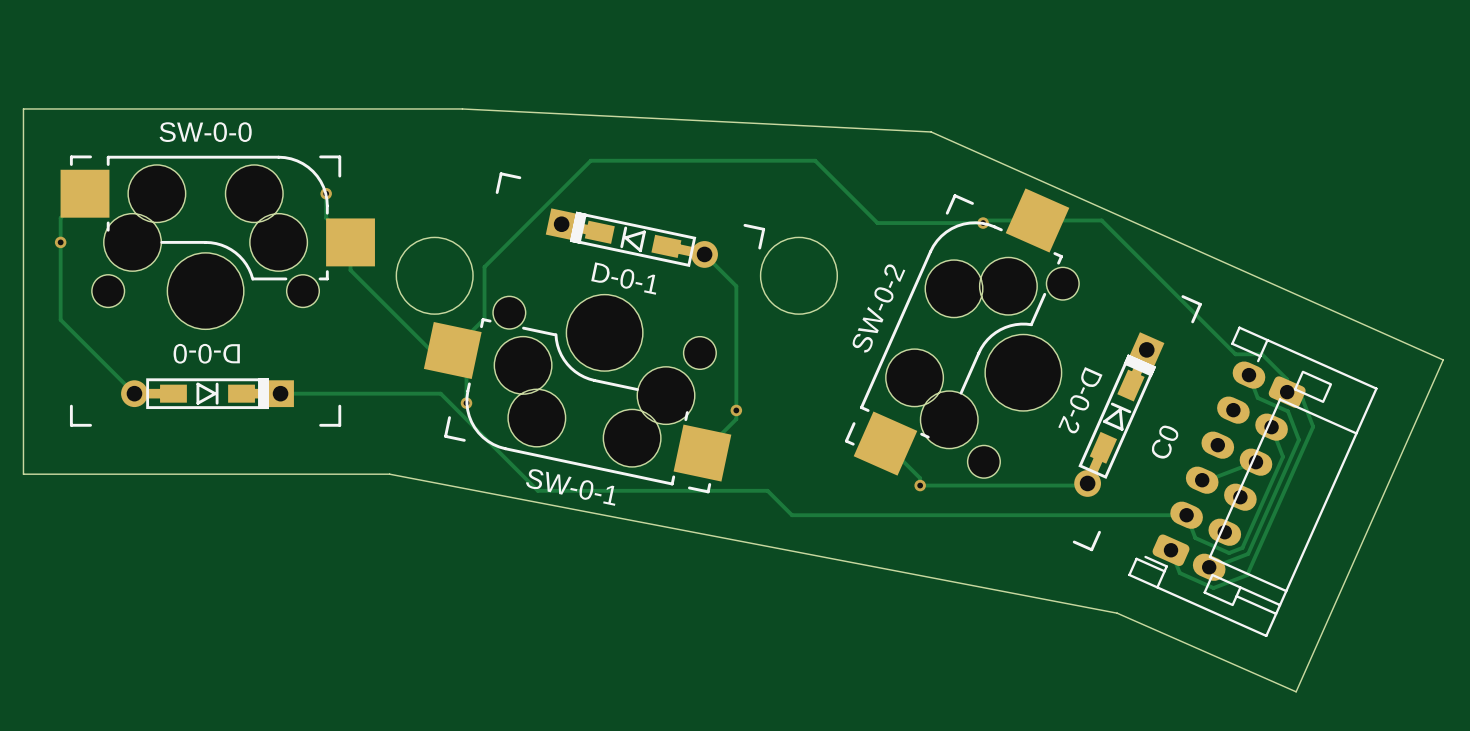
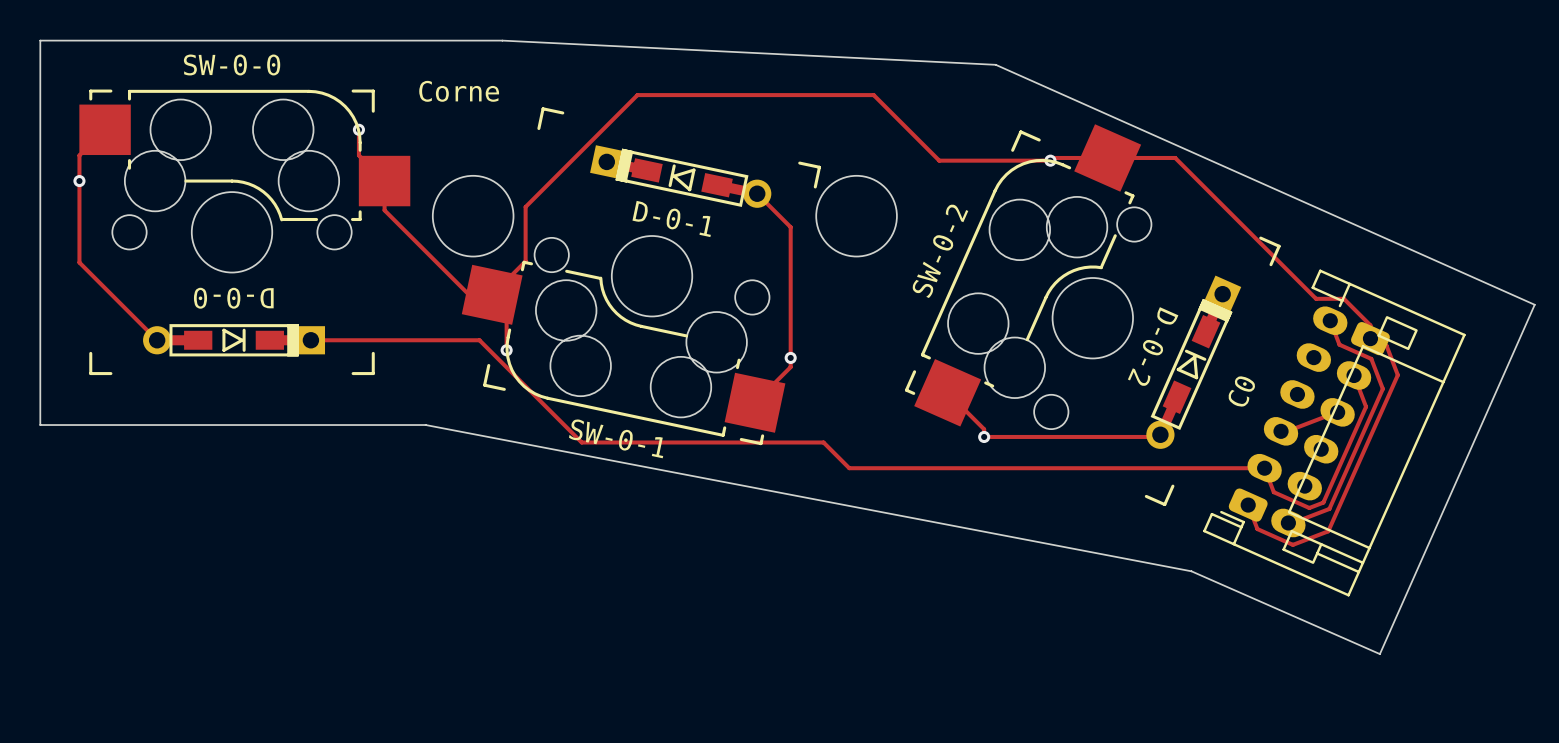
text: none -> Corne (459, 91)

